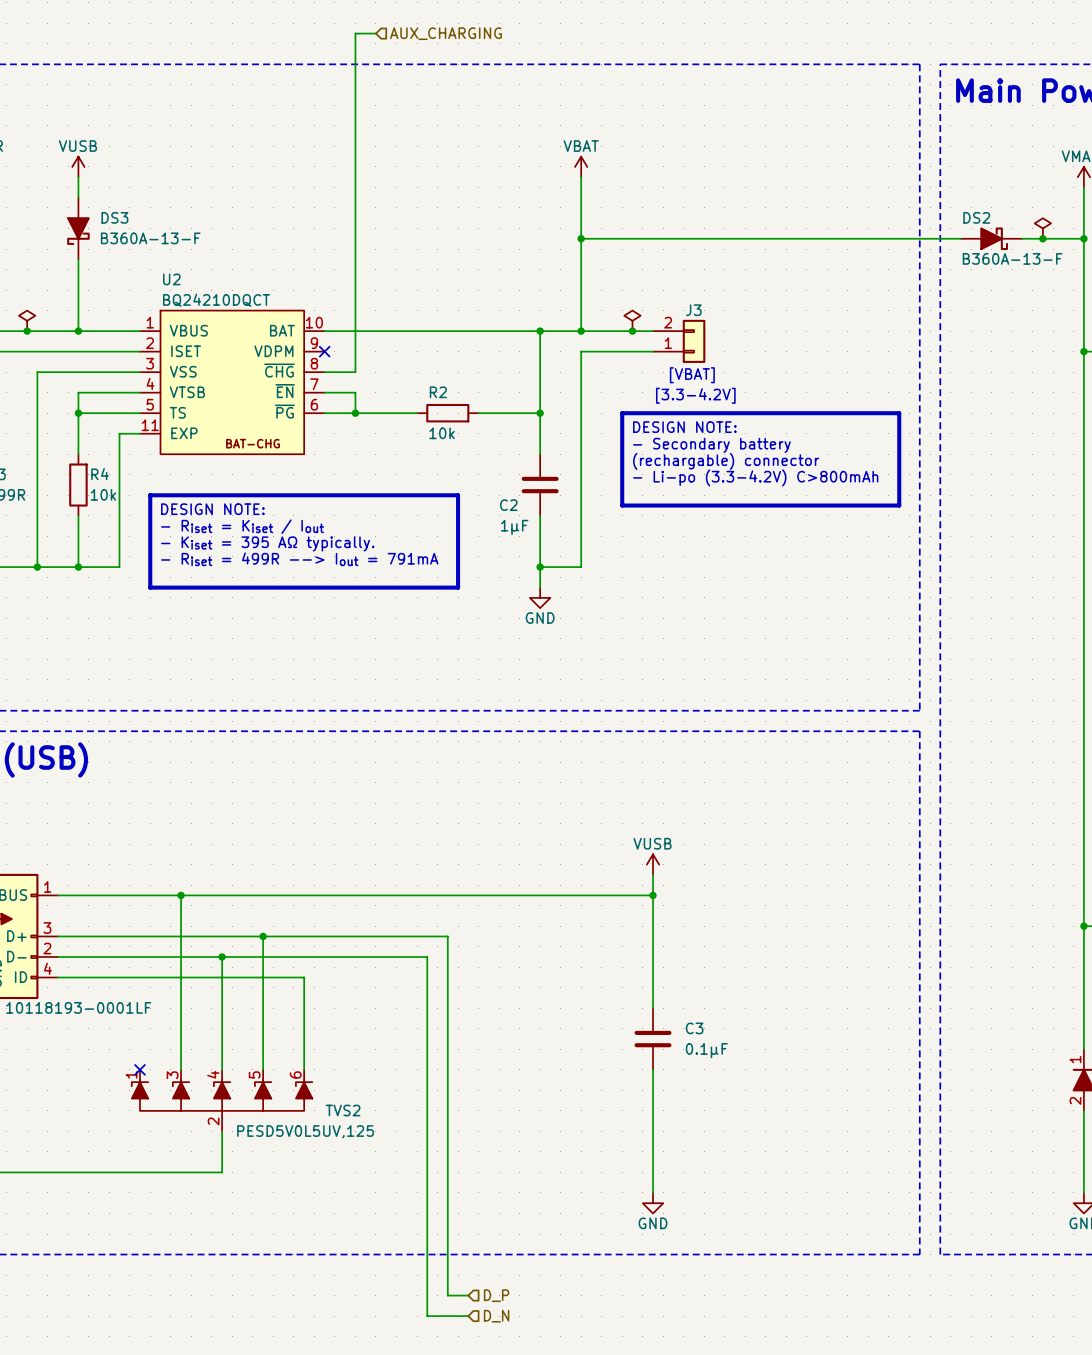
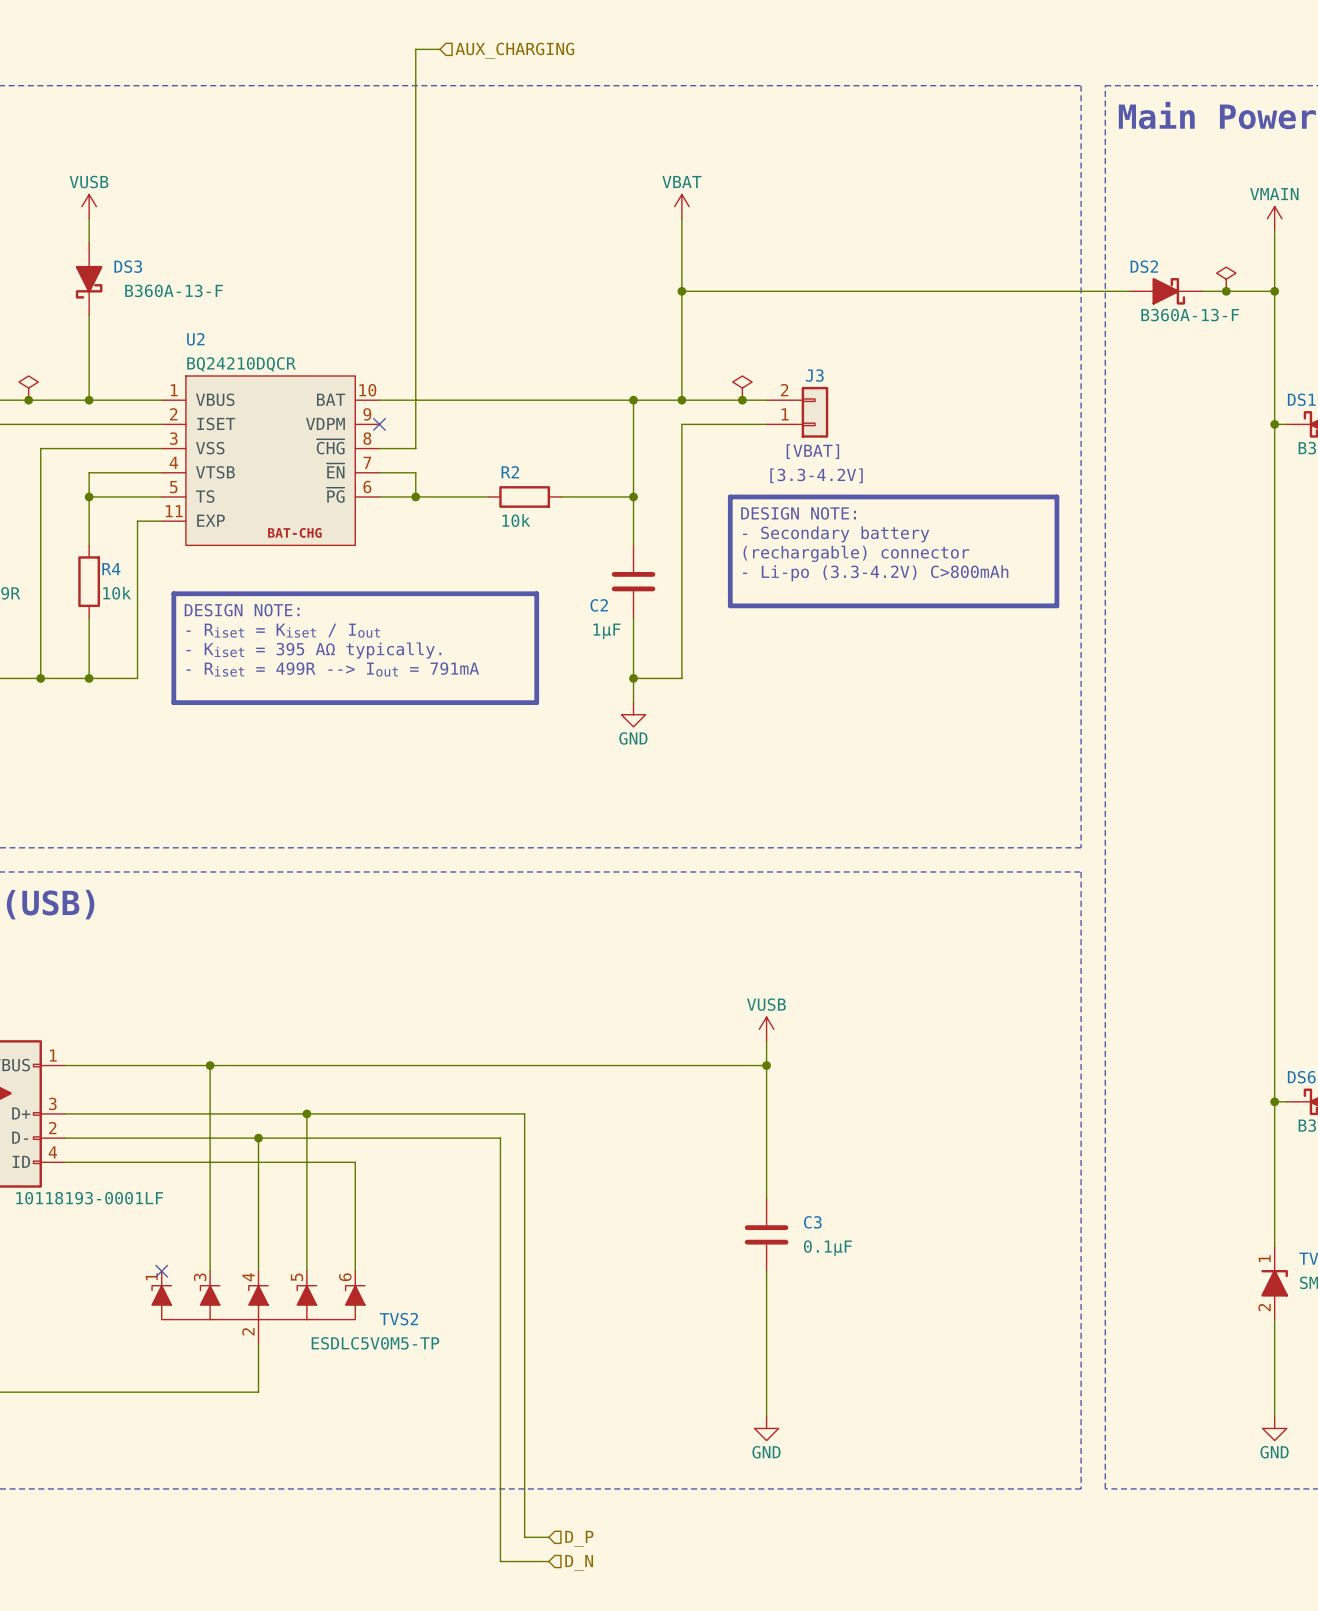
U2 value: BQ24210DQCT (216, 300) -> BQ24210DQCR (241, 364)
TVS2 value: PESD5V0L5UV,125 (305, 1131) -> ESDLC5V0M5-TP (375, 1343)

